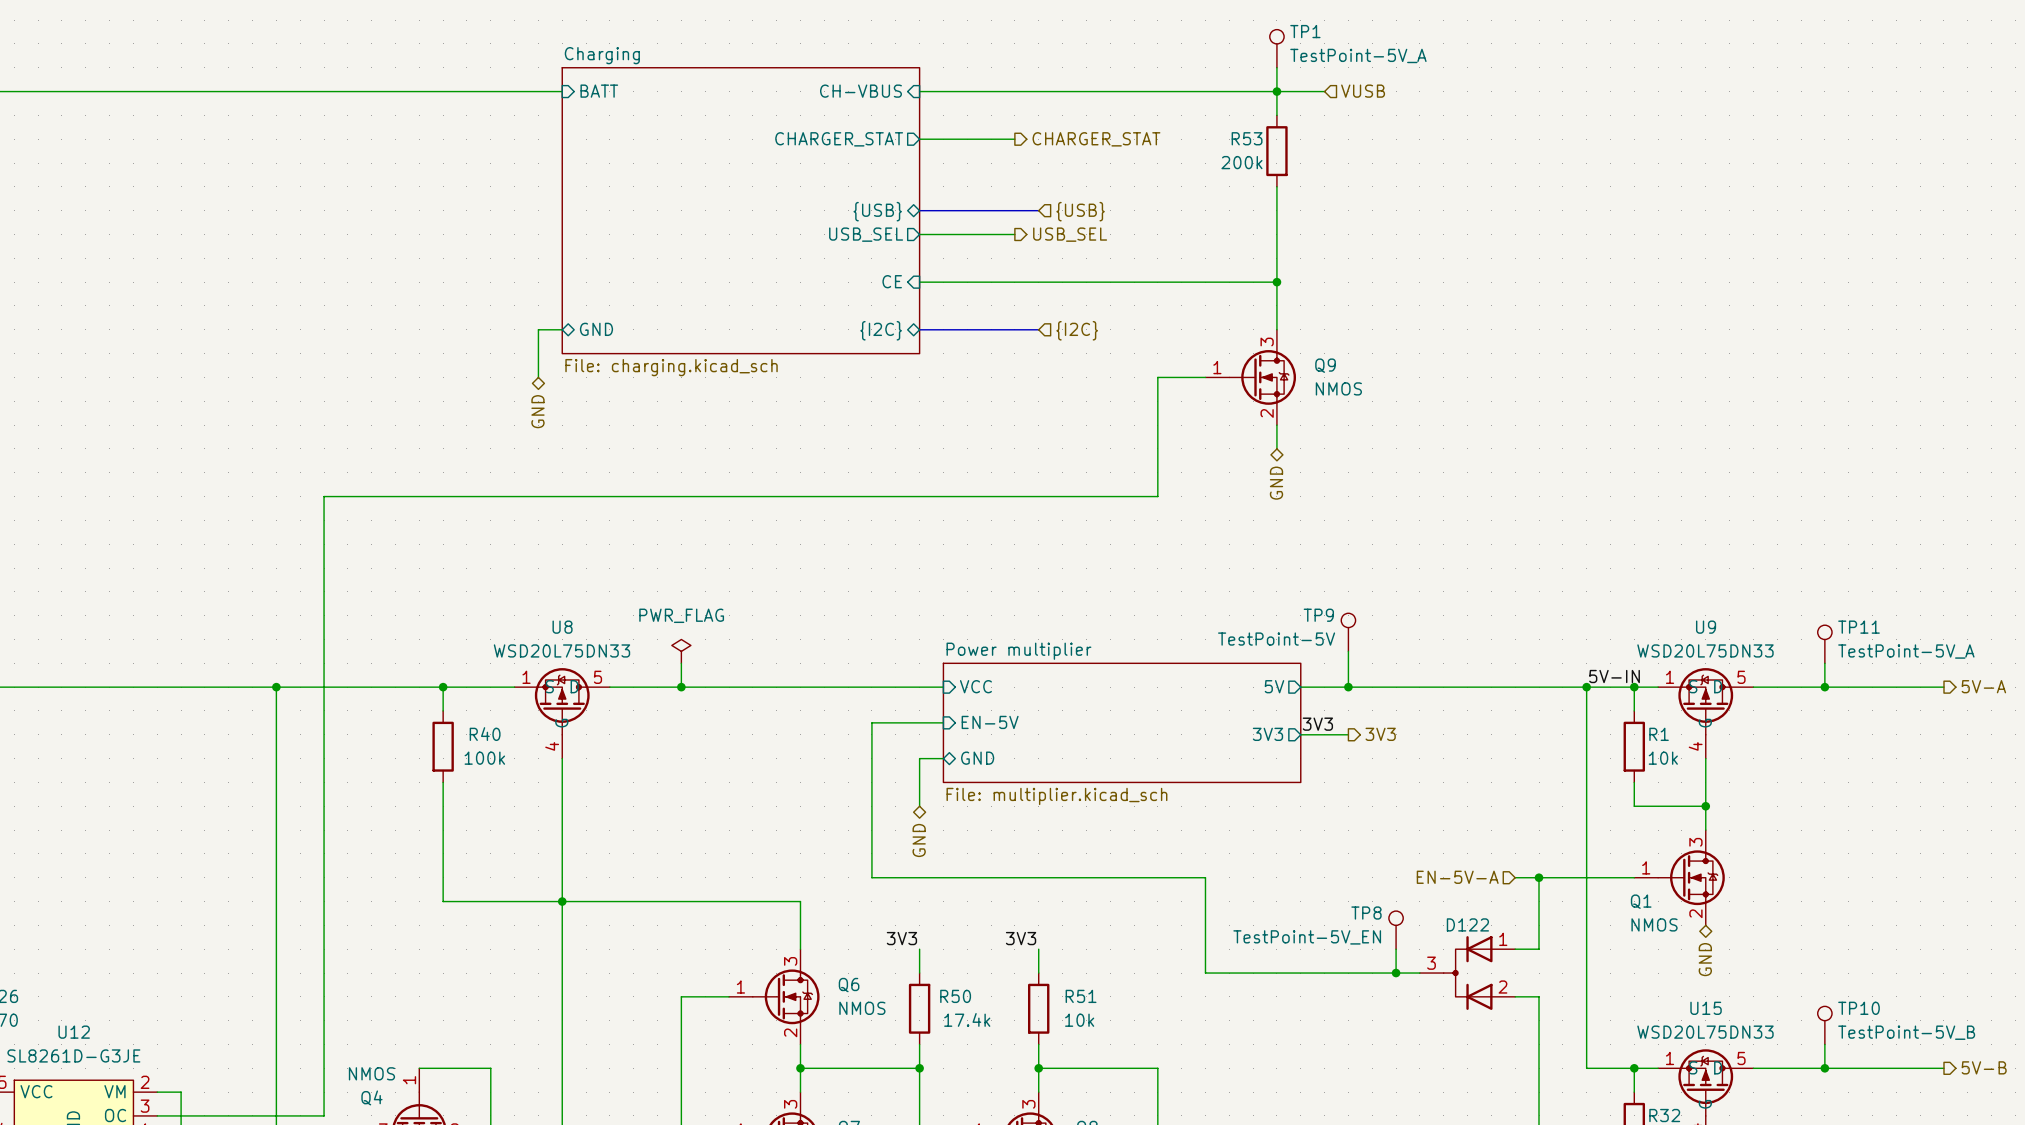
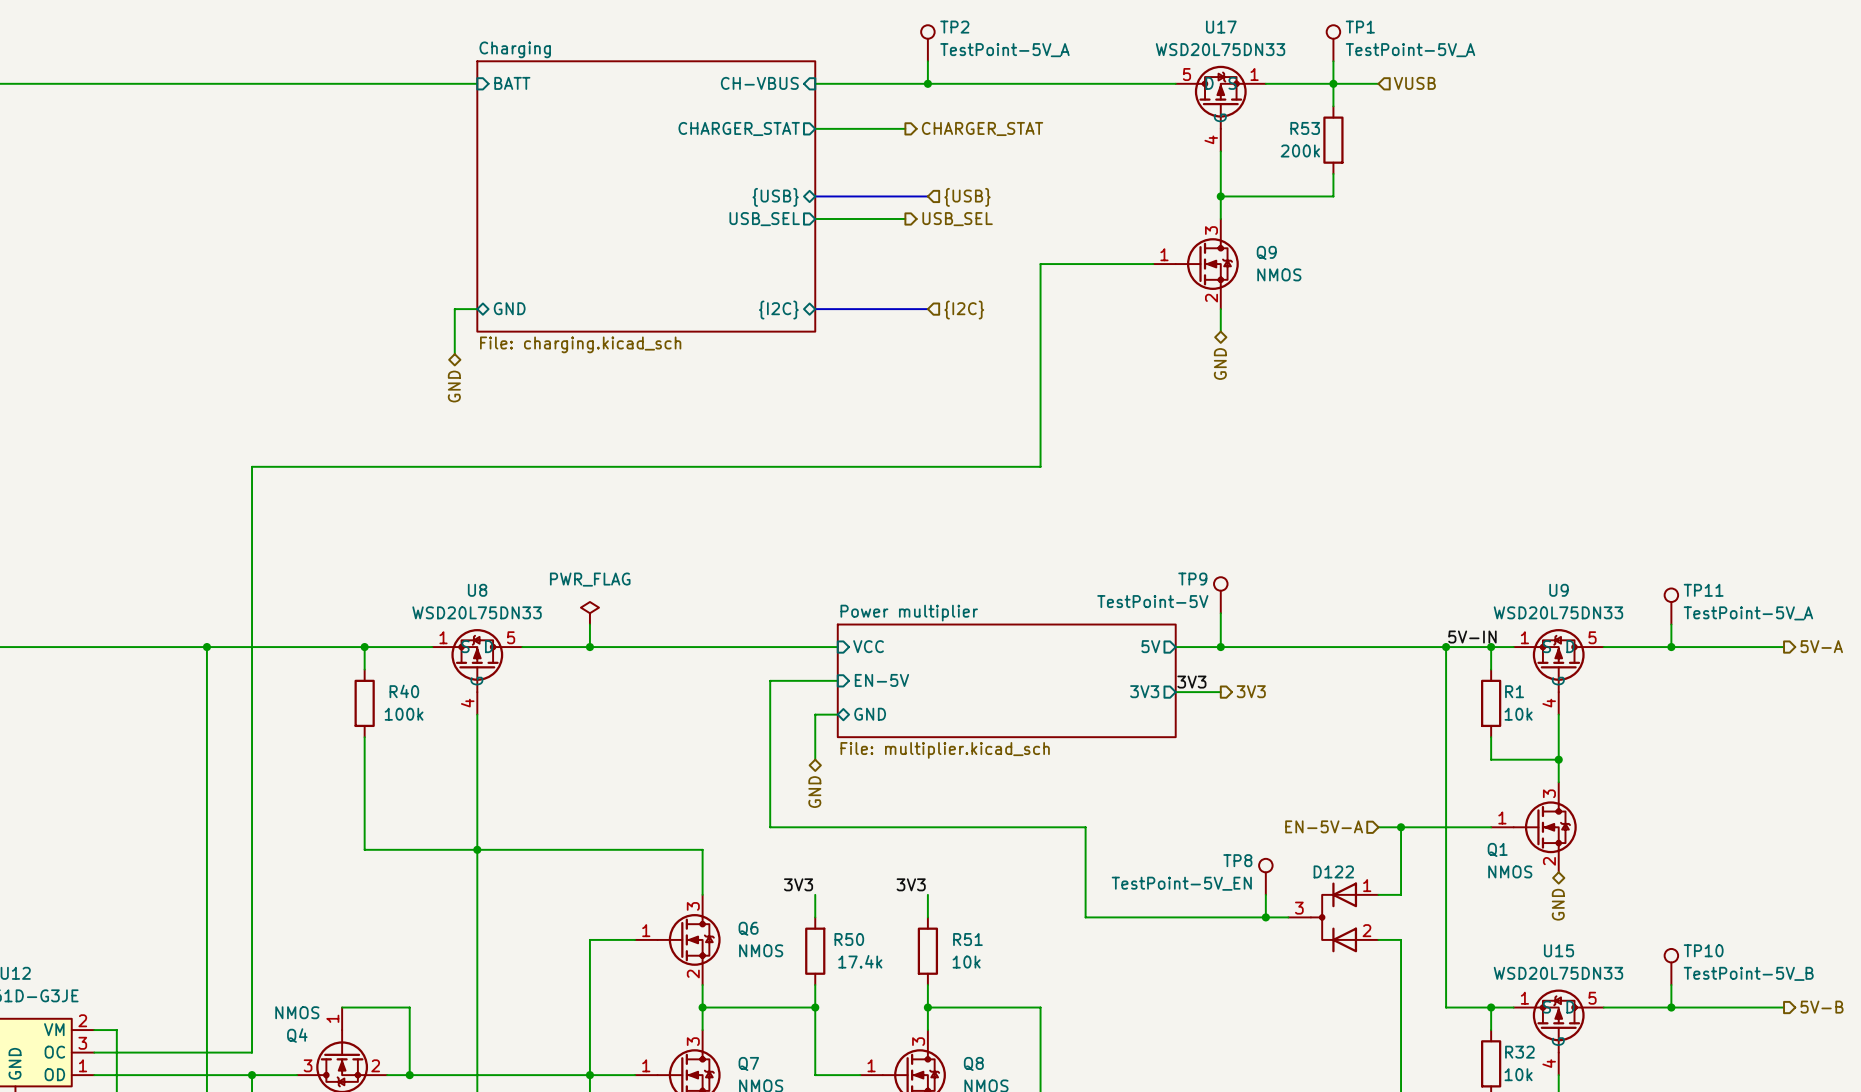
TP2: none -> TestPoint-5V_A (927, 43)
TP1 position: (1276, 48) -> (1333, 43)
wire: none -> (927, 61) (927, 83)
wire: (1276, 67) (1276, 115) -> (1333, 61) (1333, 106)
junction: none -> (927, 83)
junction: (1276, 91) -> none
hierarchical label position: VUSB (1363, 91) -> VUSB (1414, 83)
wire: none -> (1265, 83) (1378, 83)
junction: none -> (1333, 83)
U17: none -> WSD20L75DN33 (1220, 108)
R53 position: (1276, 151) -> (1333, 140)
wire: none -> (1220, 151) (1220, 218)
wire: (1276, 186) (1276, 329) -> none
wire: none -> (1333, 173) (1333, 196) (1220, 196)
junction: none -> (1220, 196)
sheet pin: CE (892, 281) -> none
wire: (919, 282) (1157, 282) -> none
junction: (1276, 282) -> none
wire: (1157, 377) (1205, 377) -> (1040, 354) (1040, 264)
Q9 position: (1250, 377) -> (1196, 264)
wire: (1276, 425) (1276, 448) -> (1220, 309) (1220, 331)
hierarchical label position: GND (1276, 483) -> GND (1220, 364)

